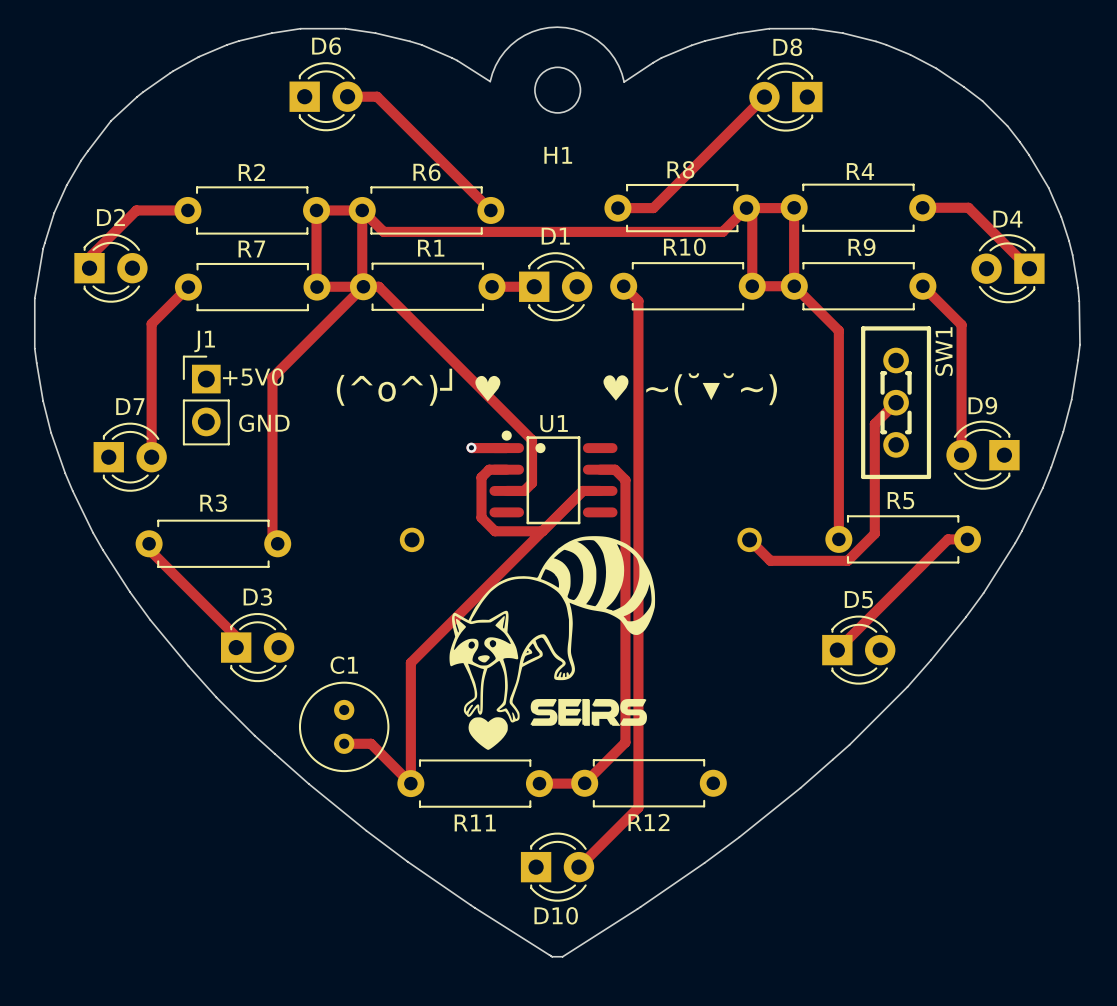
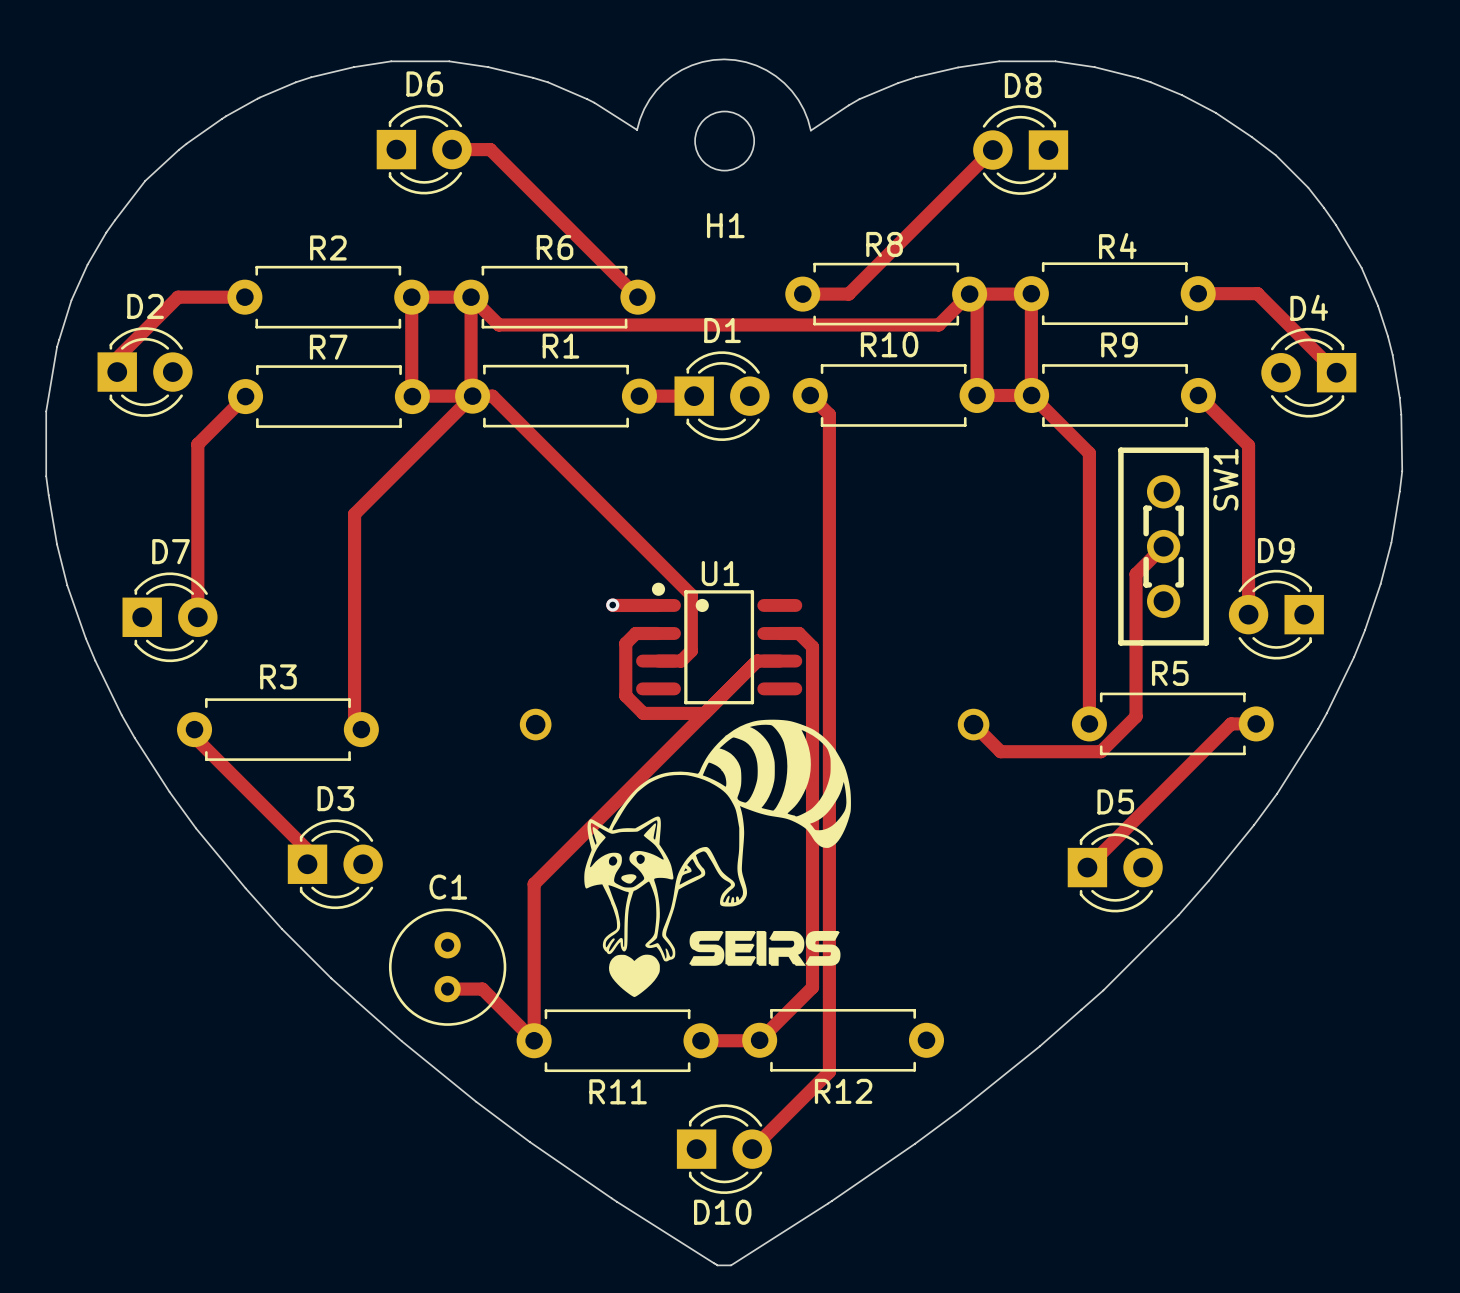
text: (^o^)┘ ♥ (418, 387) -> none
text: ♥ ~(˘▾˘~) (690, 389) -> none
J1: (206, 400) -> none

